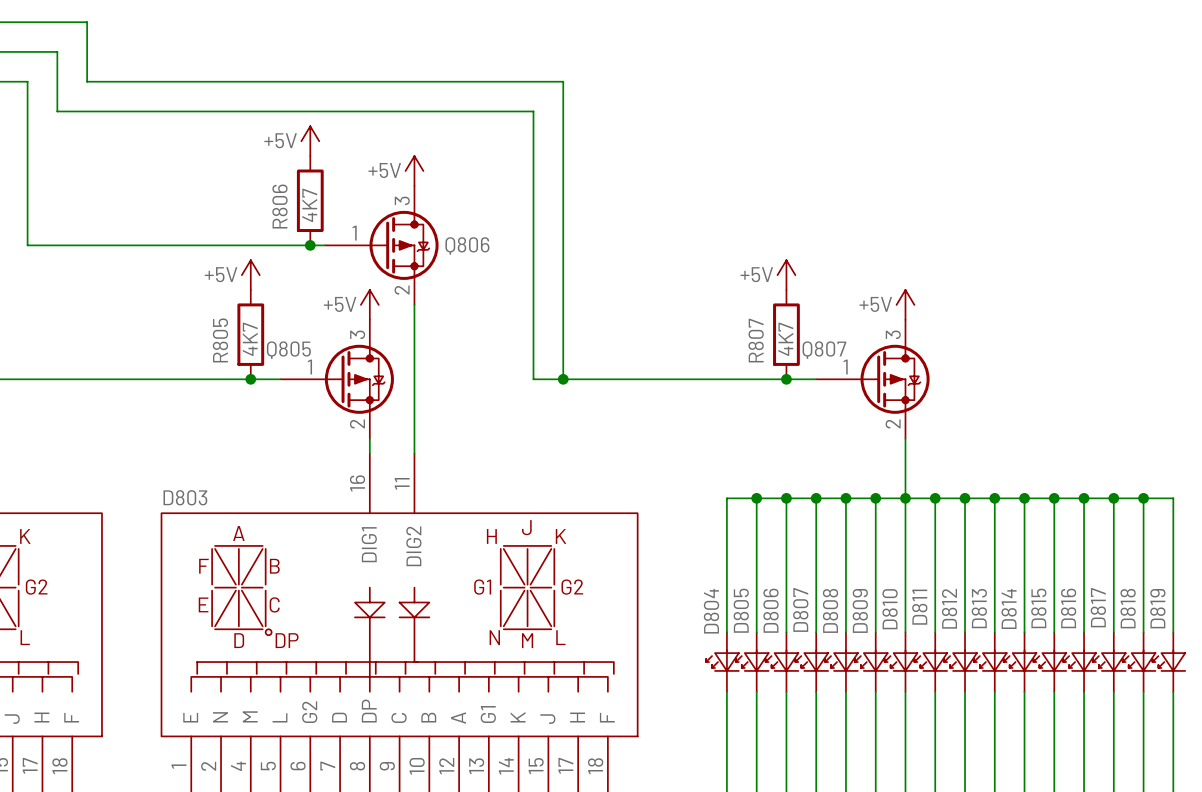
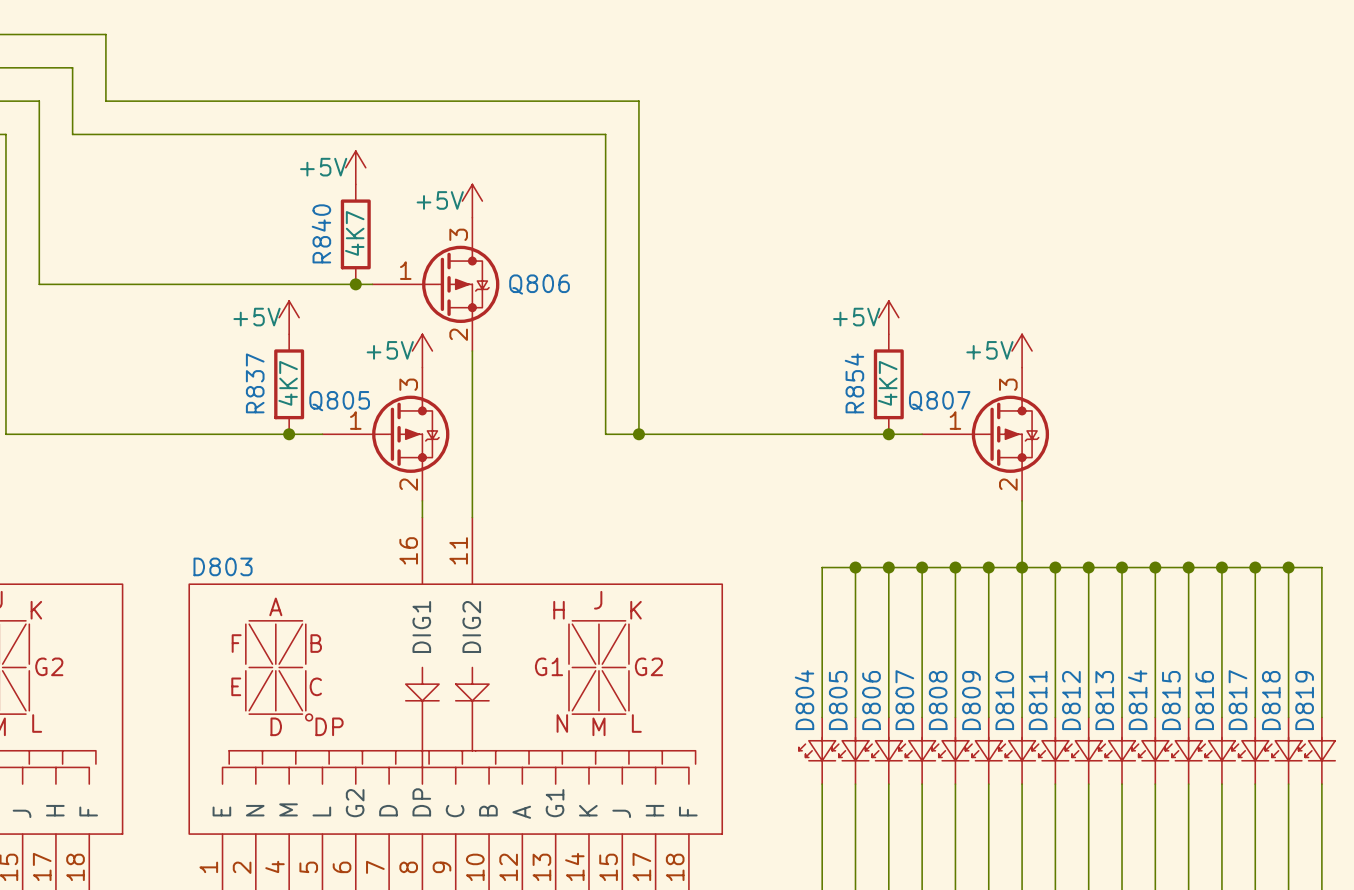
R806 name: R806 (279, 206) -> R840 (321, 233)
R805 name: R805 (220, 340) -> R837 (255, 383)
R807 name: R807 (756, 340) -> R854 (854, 383)

